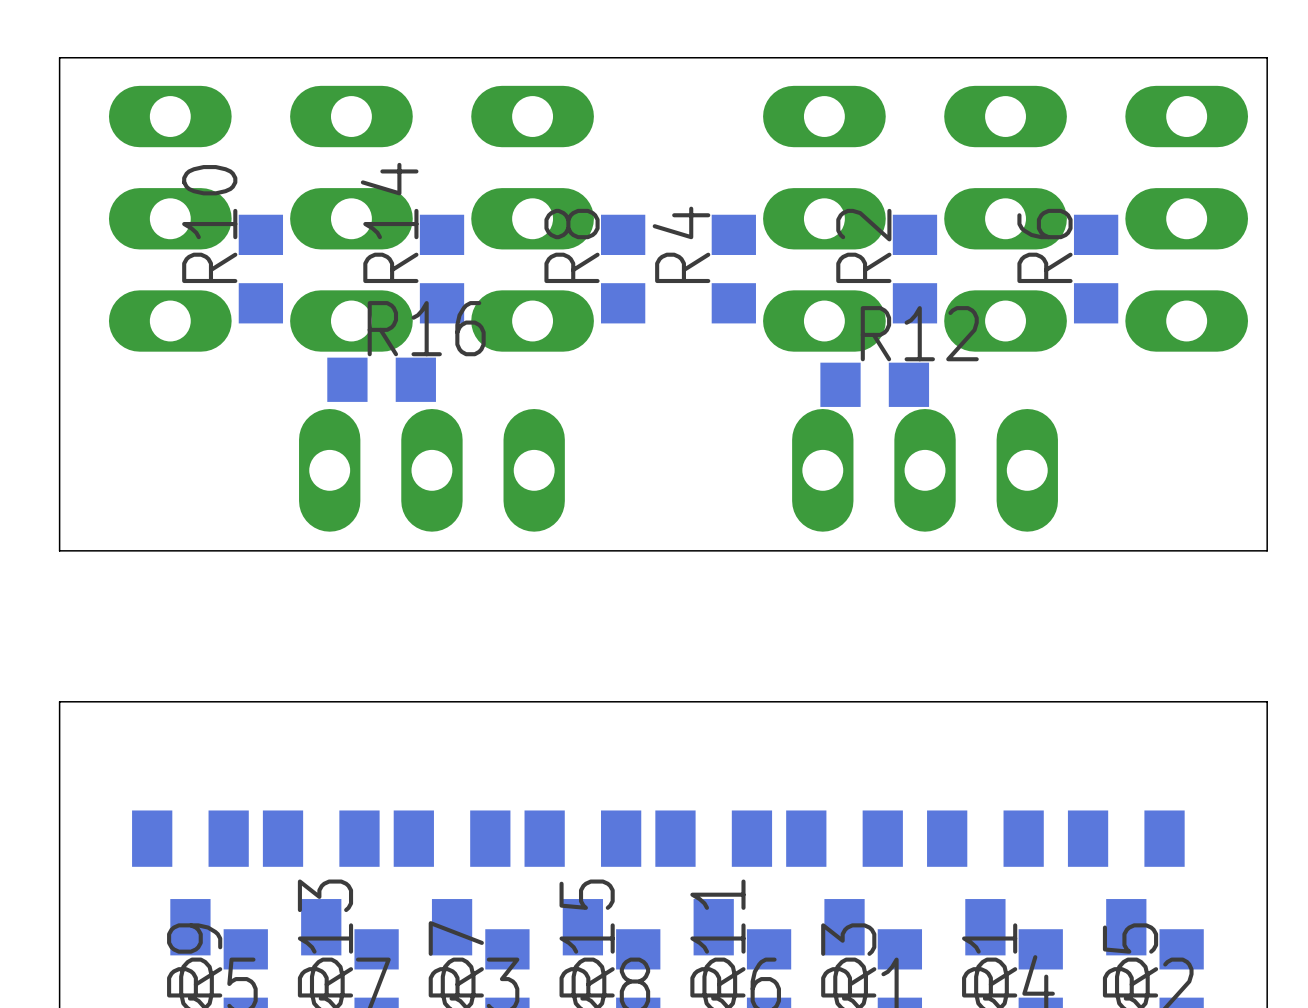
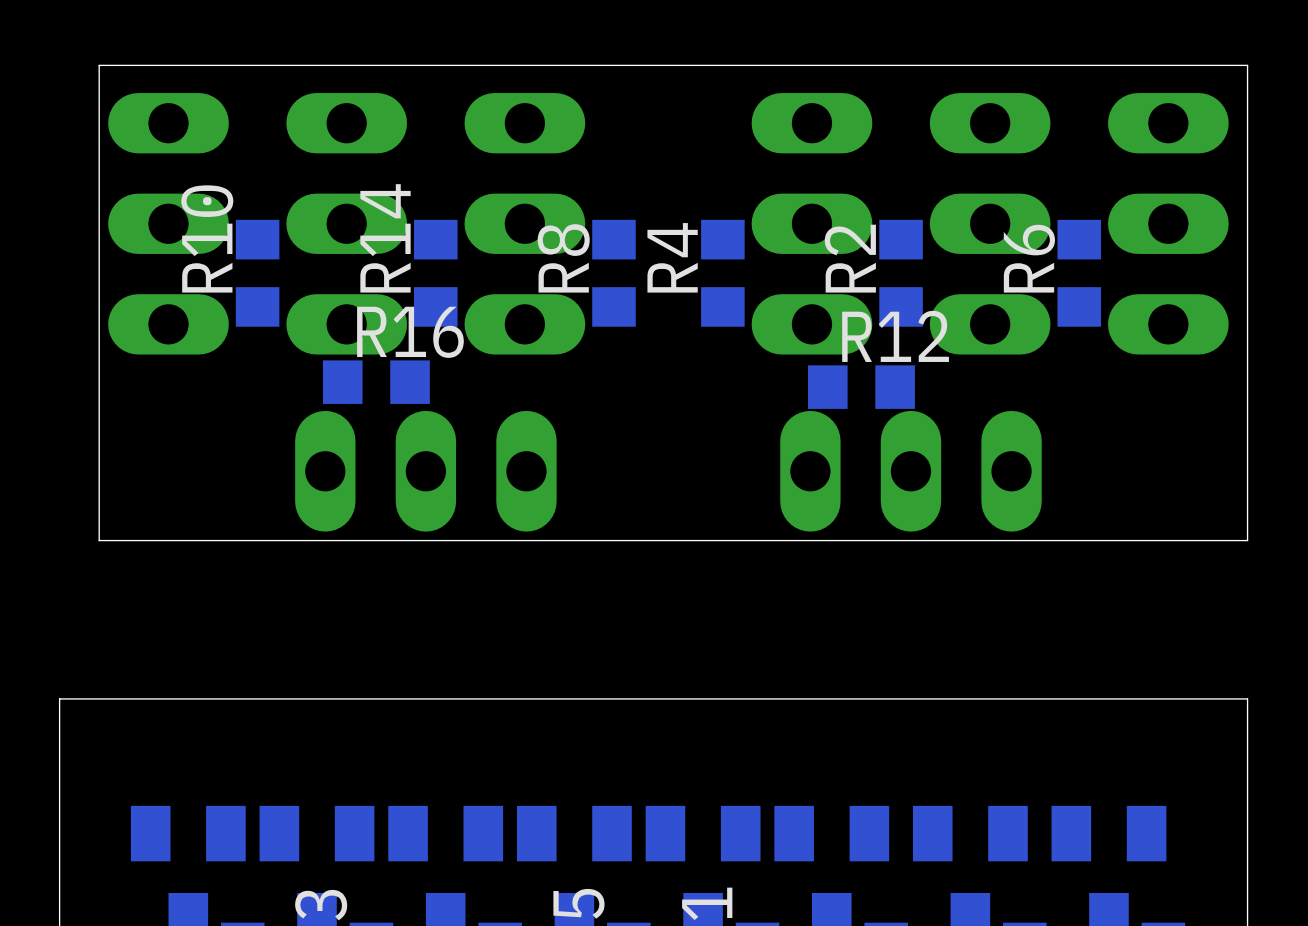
board edge: (99, 57) (59, 57) (59, 550) (1267, 550) (1267, 540) -> (99, 65) (99, 540) (1247, 540)

